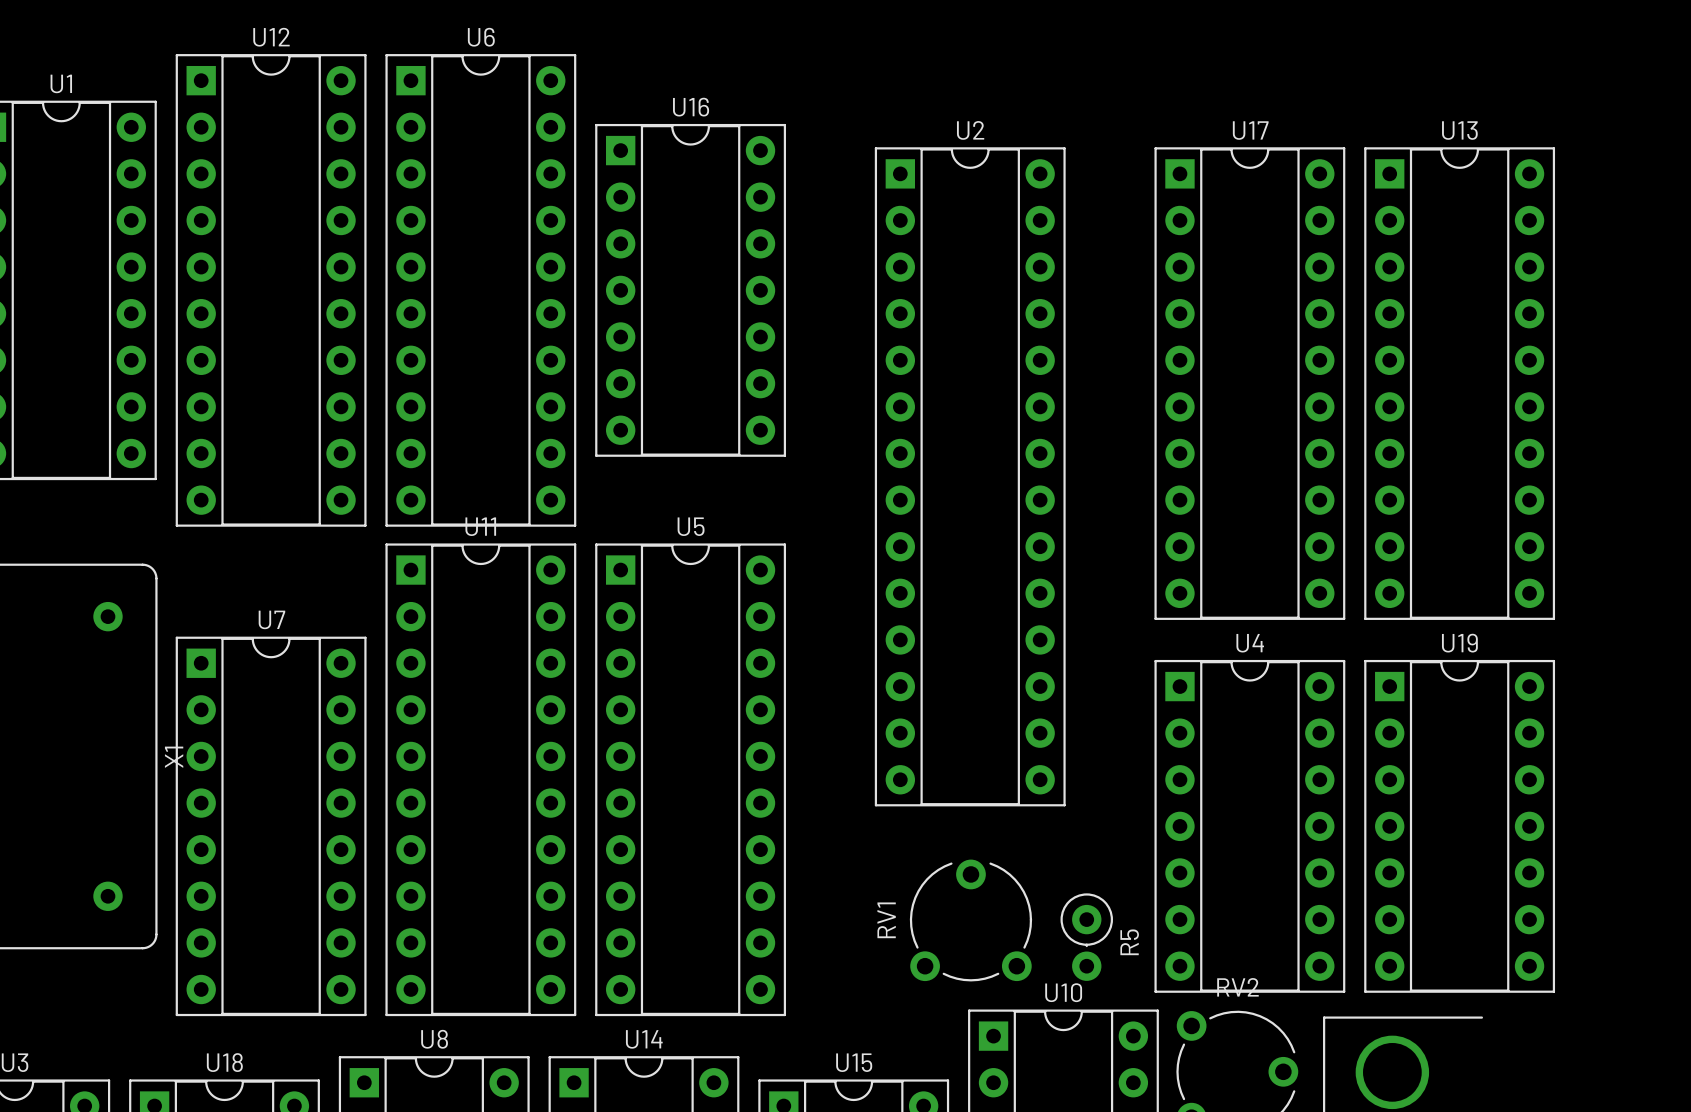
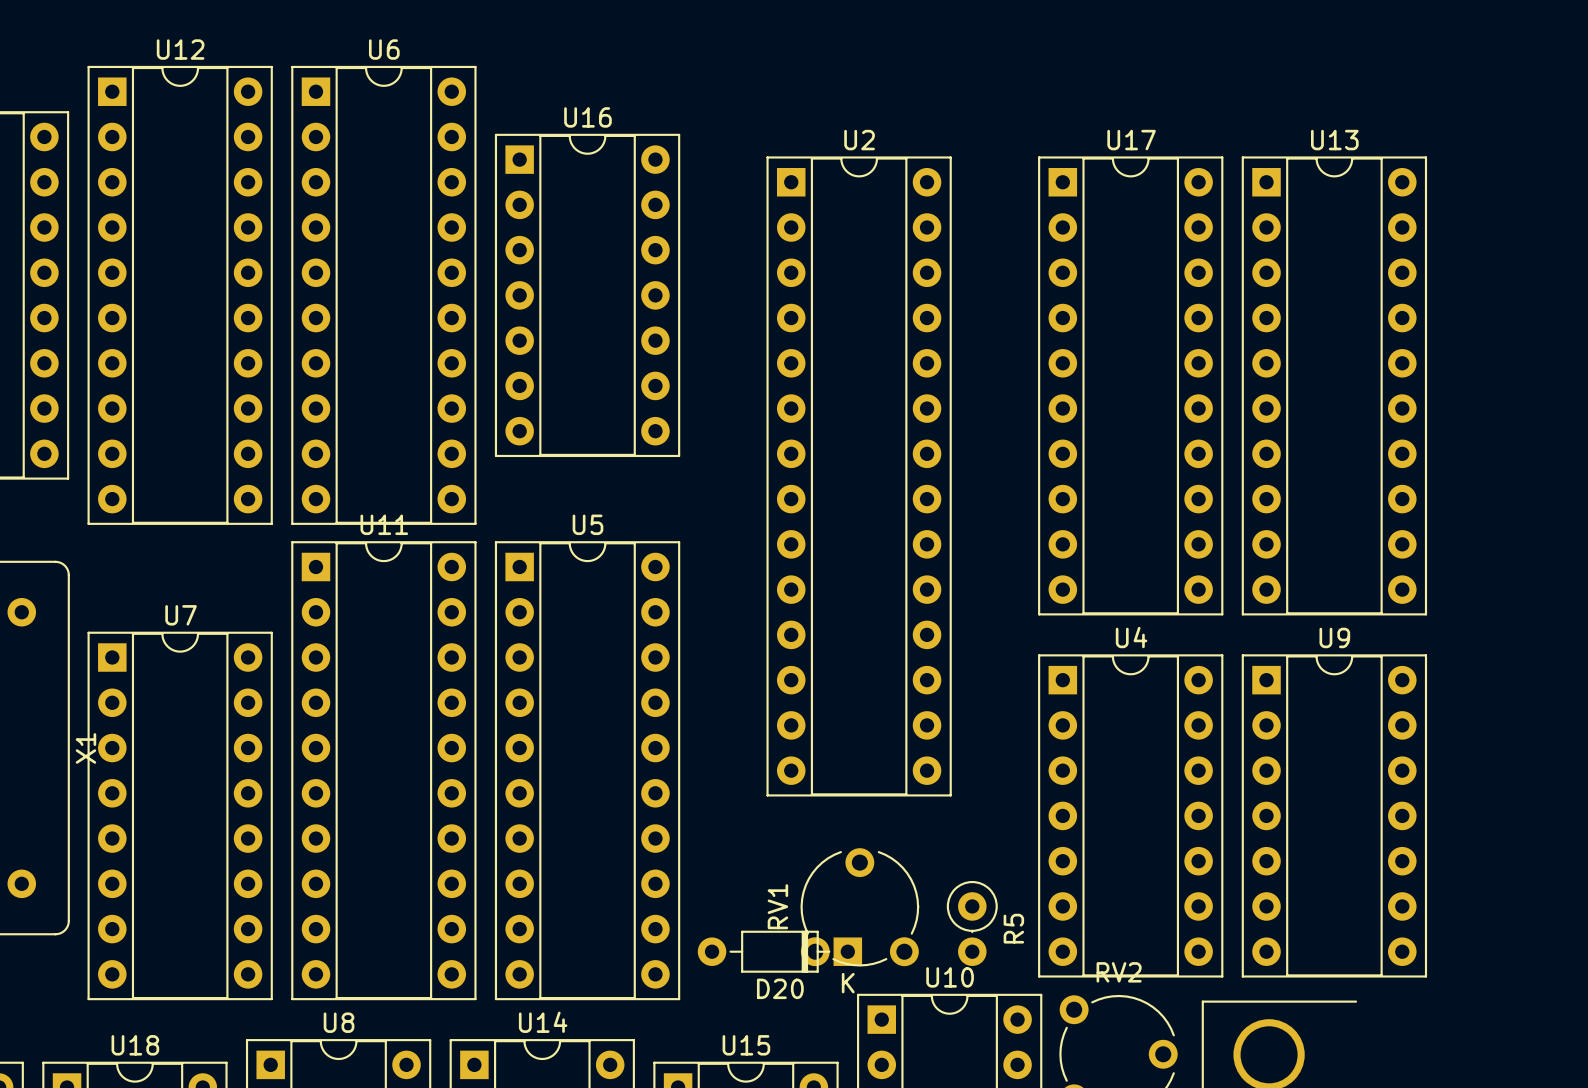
U19 name: U19 (1459, 643) -> U9 (1334, 637)
D20: none -> (779, 951)

